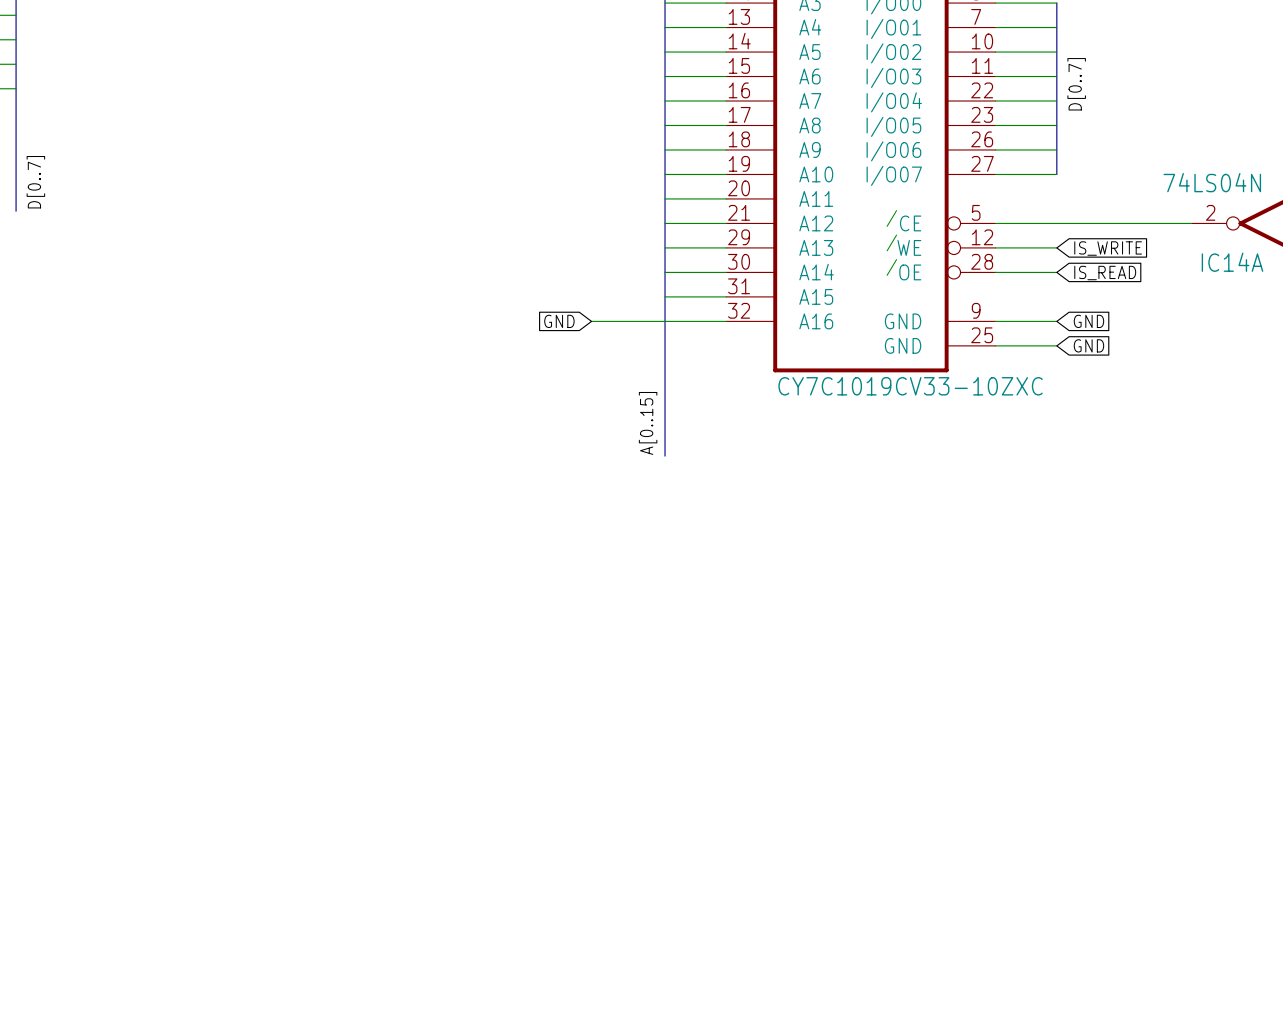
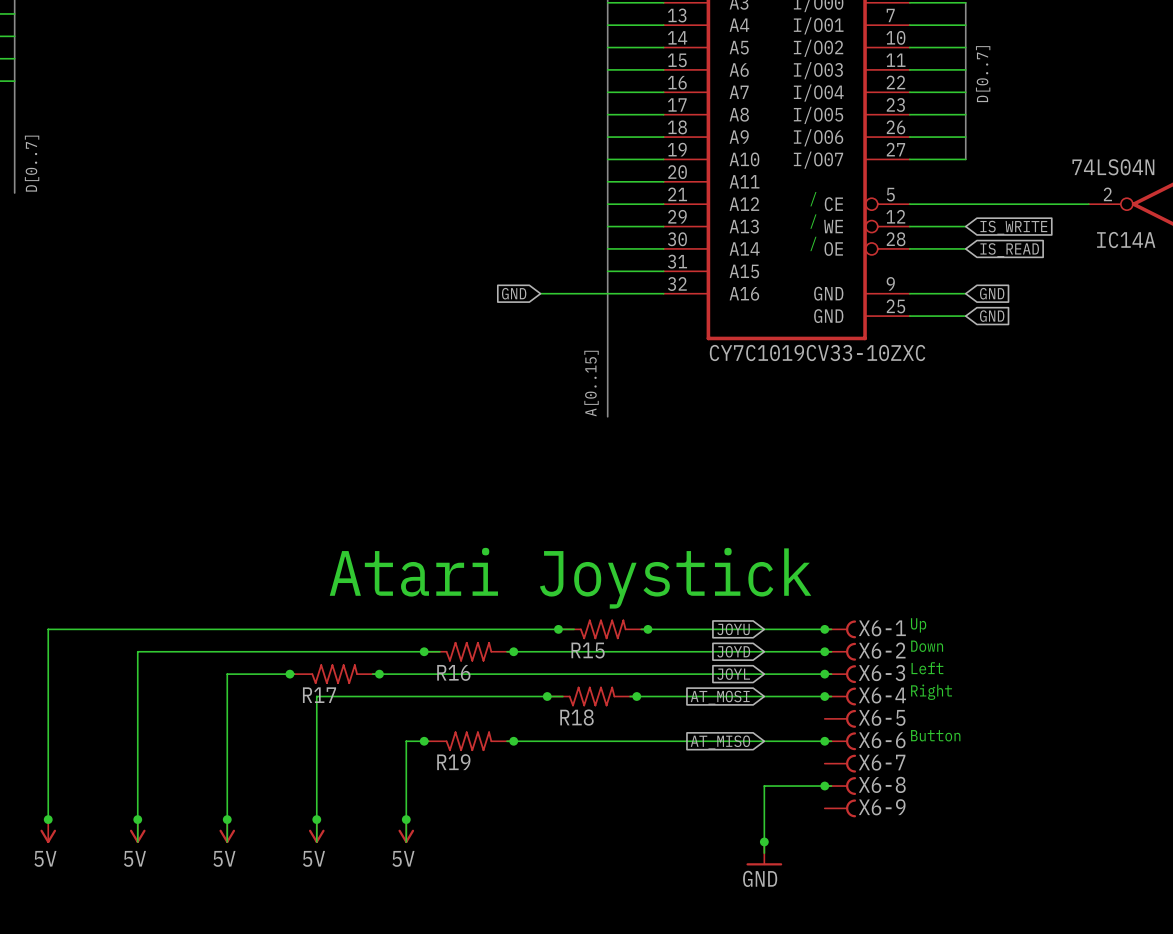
text: none -> Atari Joystick (570, 578)
text: none -> Up (918, 625)
junction: none -> (558, 629)
wire: none -> (574, 629) (48, 629) (48, 819)
R15: none -> (603, 629)
wire: none -> (641, 629) (831, 629)
junction: none -> (647, 629)
global label: none -> JOYU (733, 629)
junction: none -> (824, 629)
X6-1: none -> (840, 629)
text: none -> Down (927, 646)
junction: none -> (424, 651)
wire: none -> (439, 651) (137, 651) (137, 841)
R16: none -> (468, 651)
wire: none -> (506, 651) (831, 651)
junction: none -> (513, 651)
global label: none -> JOYD (733, 651)
junction: none -> (824, 651)
X6-2: none -> (840, 651)
text: none -> Left (927, 668)
junction: none -> (289, 674)
wire: none -> (294, 674) (227, 674) (227, 841)
R17: none -> (334, 674)
wire: none -> (372, 674) (831, 674)
junction: none -> (379, 674)
global label: none -> JOYL (733, 674)
junction: none -> (824, 674)
X6-3: none -> (840, 674)
text: none -> Right (931, 692)
junction: none -> (547, 696)
wire: none -> (562, 696) (316, 696) (316, 841)
R18: none -> (592, 696)
wire: none -> (630, 696) (831, 696)
junction: none -> (636, 696)
global label: none -> AT_MOSI (720, 697)
junction: none -> (824, 696)
X6-4: none -> (840, 696)
X6-5: none -> (840, 718)
text: none -> Button (935, 735)
junction: none -> (424, 741)
wire: none -> (428, 741) (406, 741) (406, 841)
R19: none -> (468, 741)
wire: none -> (506, 741) (831, 741)
junction: none -> (513, 741)
global label: none -> AT_MISO (720, 742)
junction: none -> (824, 741)
X6-6: none -> (840, 741)
X6-7: none -> (840, 763)
junction: none -> (824, 786)
wire: none -> (831, 786) (764, 786) (764, 853)
X6-8: none -> (840, 786)
X6-9: none -> (840, 808)
junction: none -> (48, 819)
junction: none -> (137, 819)
junction: none -> (227, 819)
junction: none -> (316, 819)
junction: none -> (406, 819)
power symbol: none -> 5V (48, 831)
power symbol: none -> 5V (137, 831)
power symbol: none -> 5V (227, 831)
power symbol: none -> 5V (316, 831)
power symbol: none -> 5V (406, 831)
junction: none -> (764, 841)
power symbol: none -> GND (764, 853)

